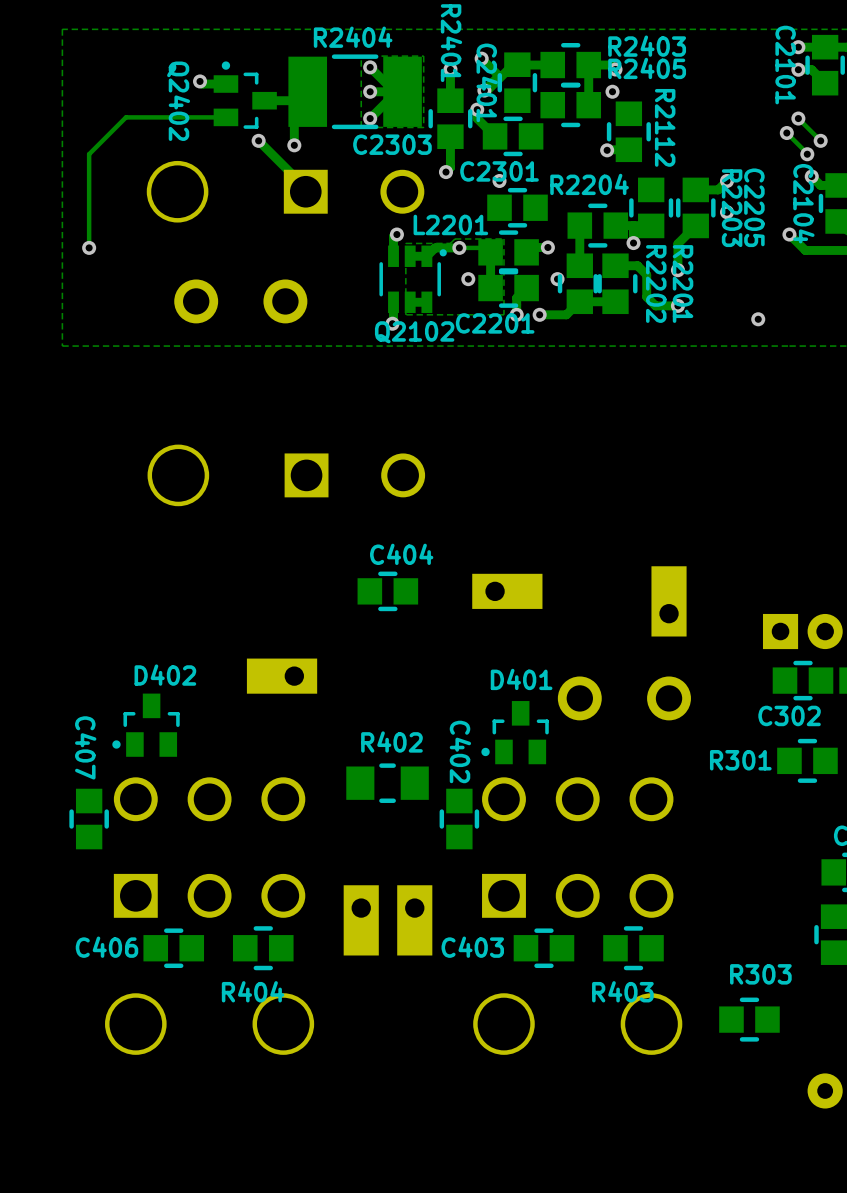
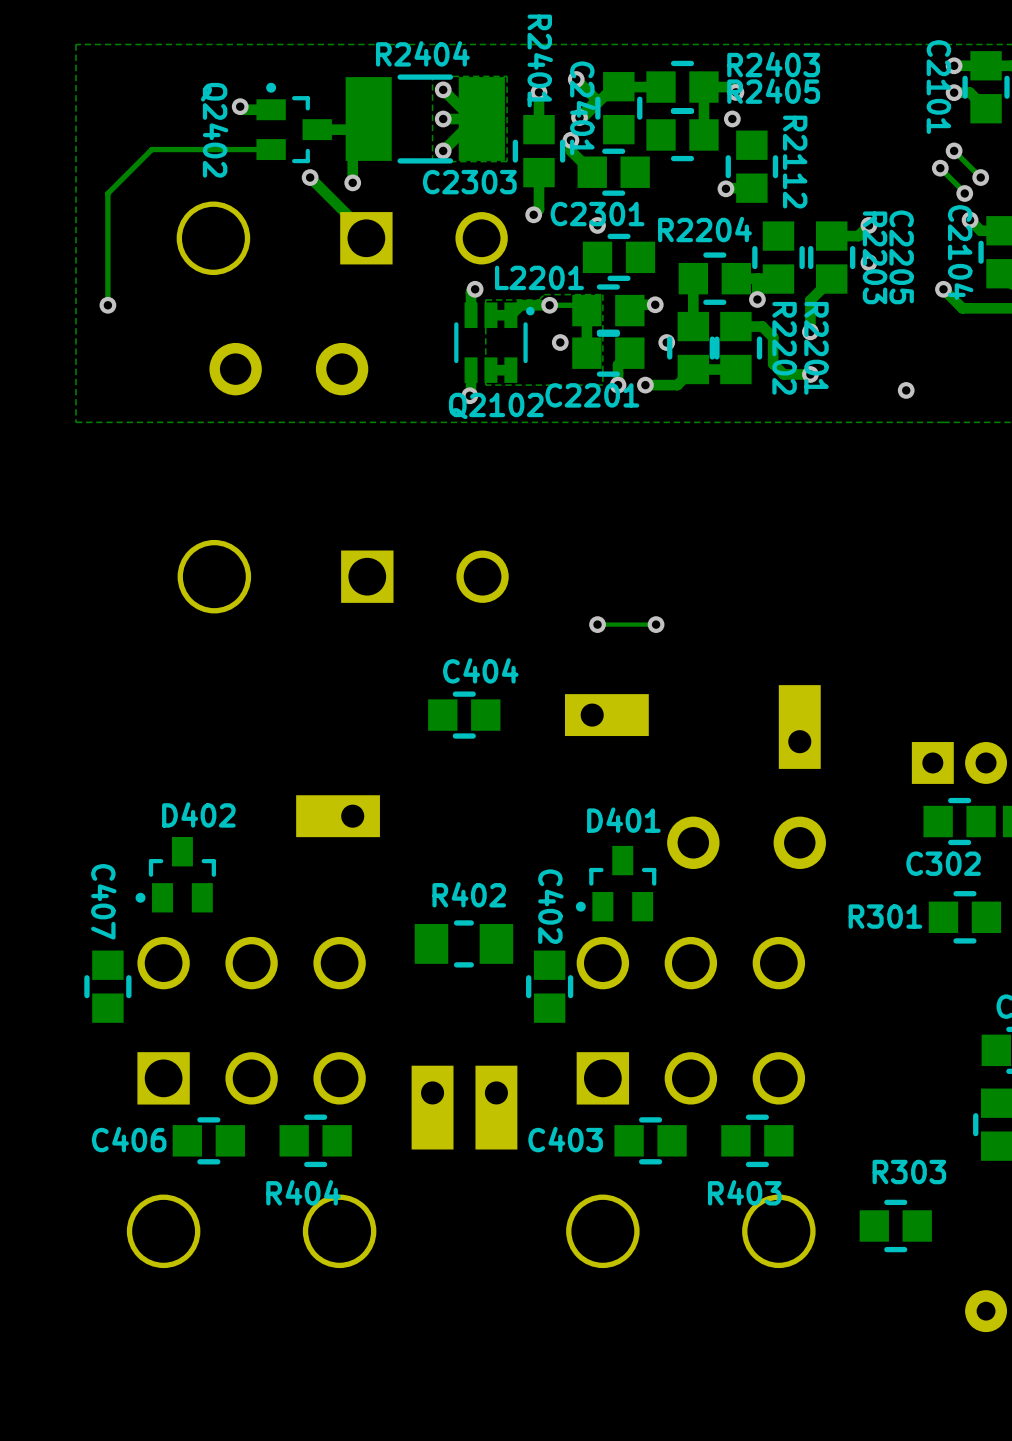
via: none -> (597, 624)
track: none -> (656, 624) (597, 624)
via: none -> (656, 624)

